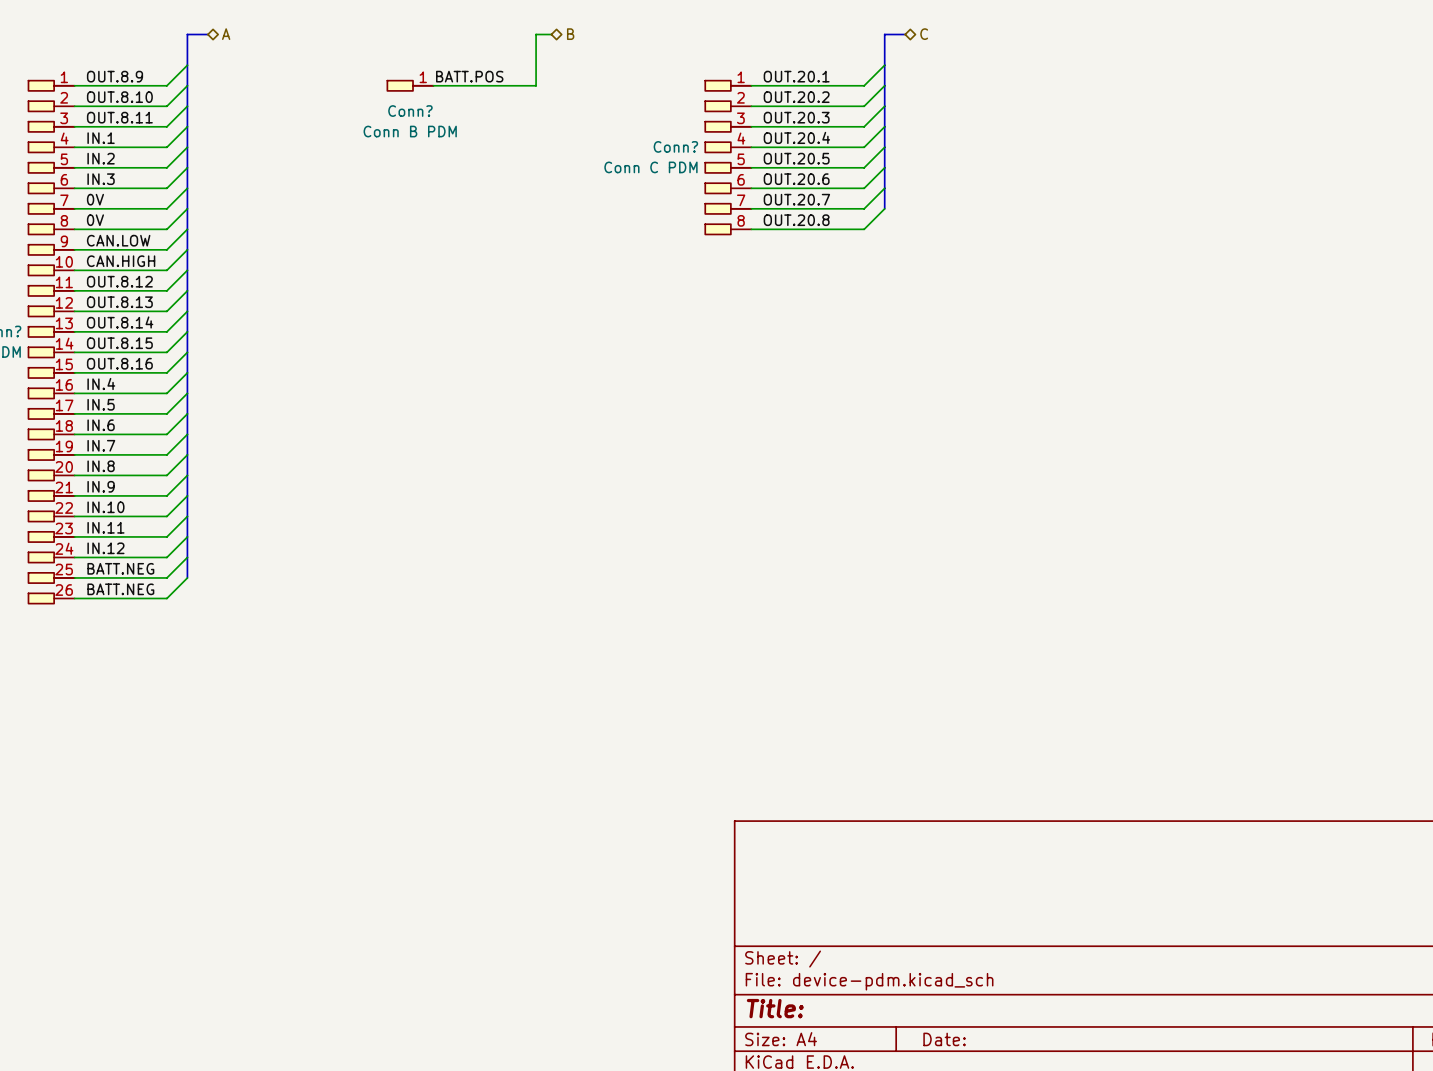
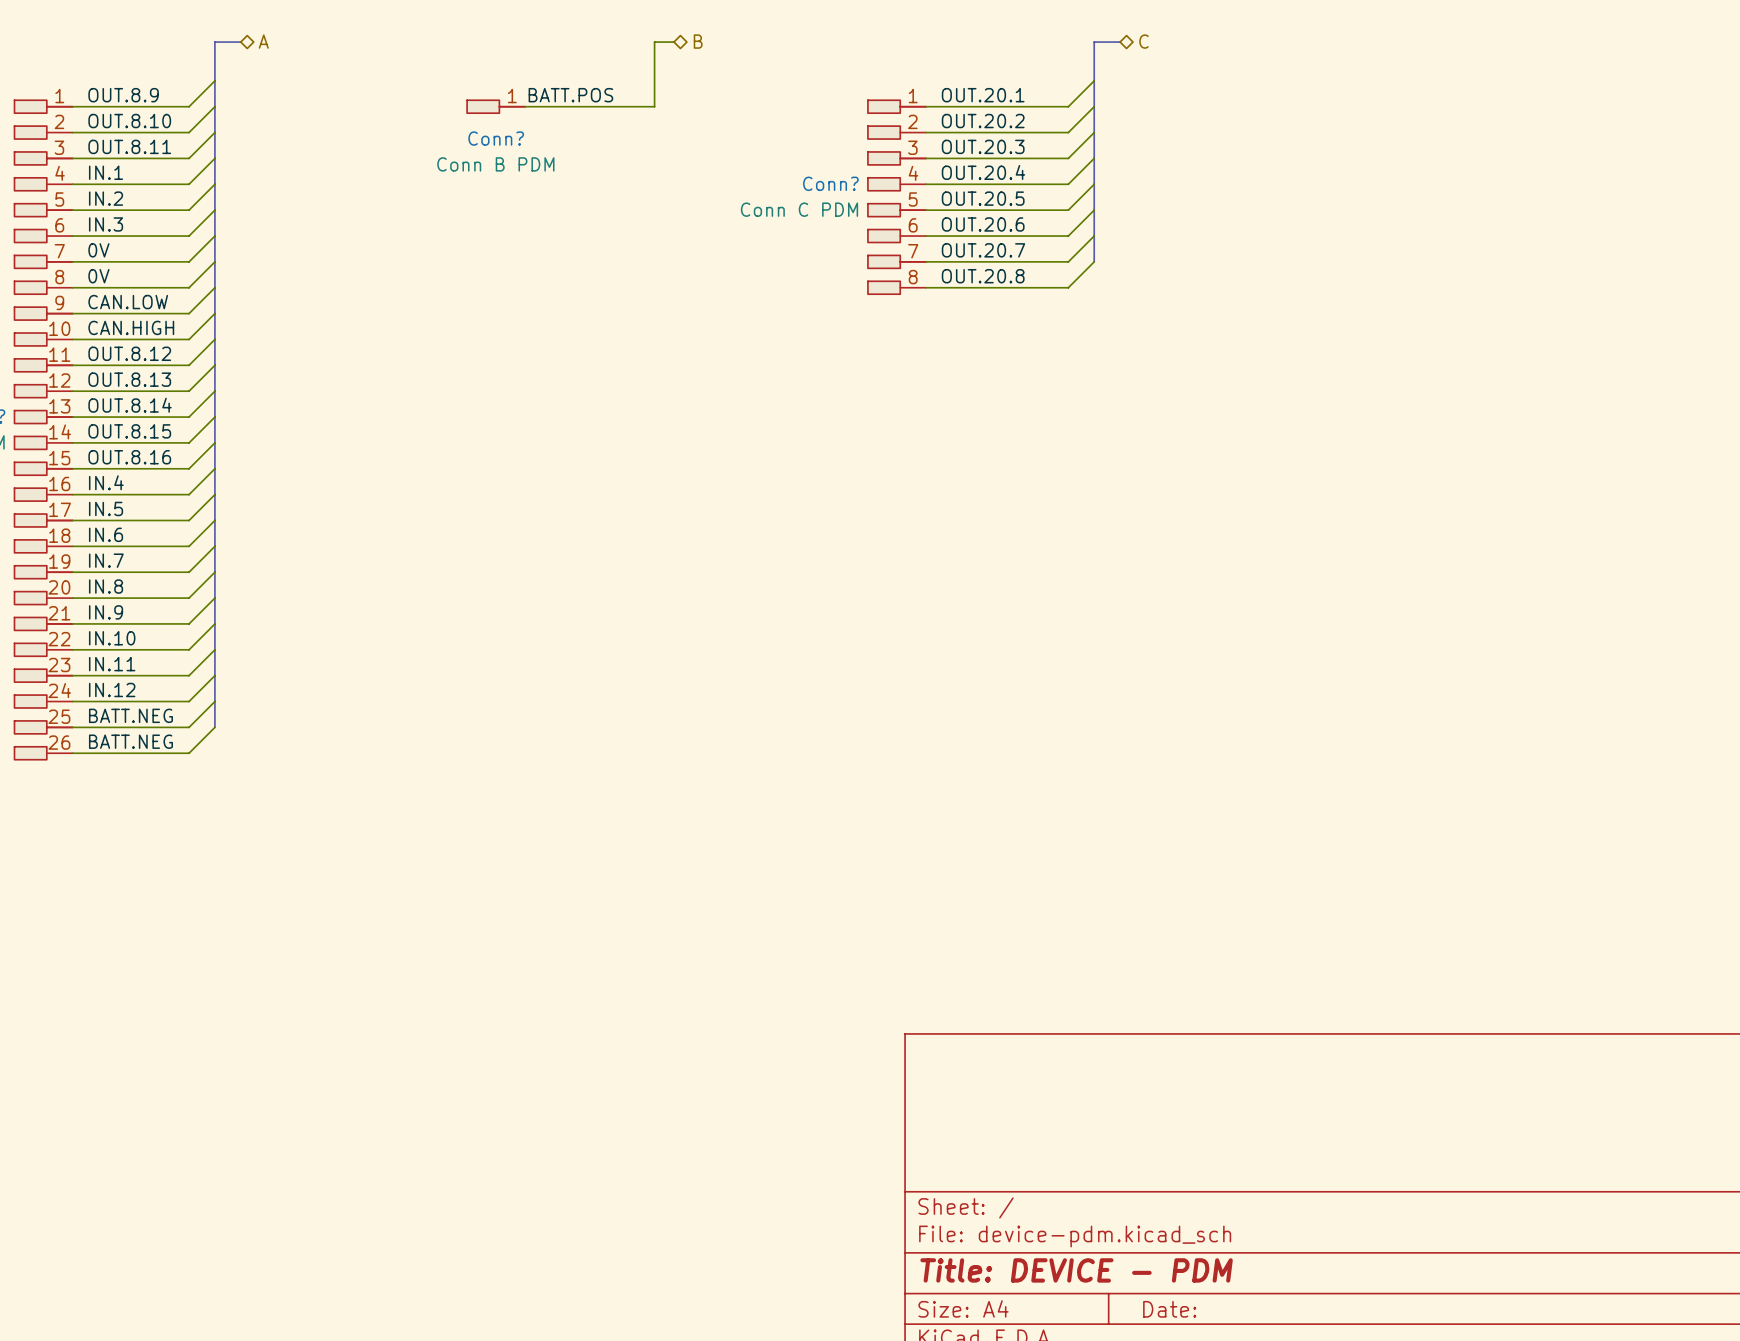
title block: Title: (775, 1008) -> Title: DEVICE - PDM (1076, 1270)

